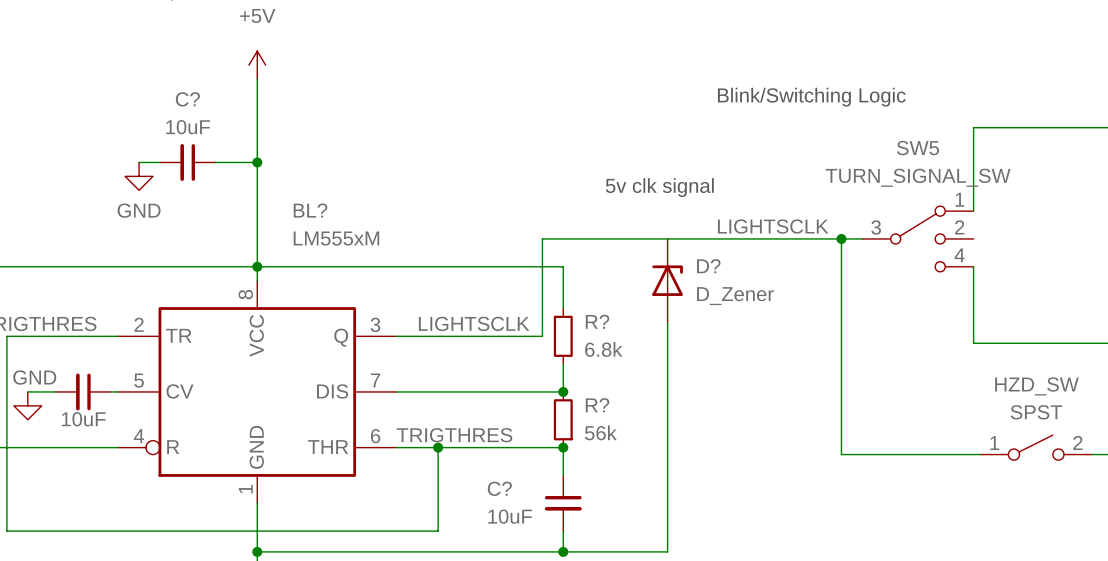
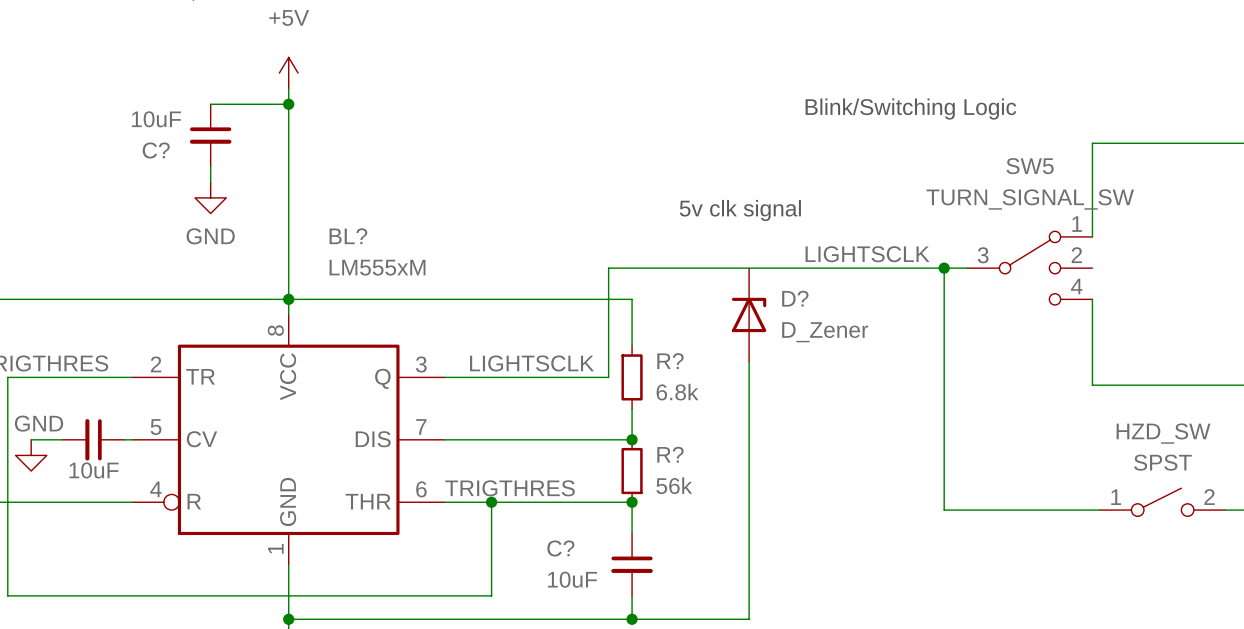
wire: none -> (210, 104) (288, 104)
junction: none -> (288, 104)
wire: none -> (210, 166) (210, 182)
wire: (139, 162) (159, 162) -> none
C? rotation: 0° (187, 162) -> 90° counterclockwise (210, 135)
C? position: (187, 162) -> (210, 135)
wire: (215, 162) (257, 162) -> none
junction: (257, 162) -> none
power symbol position: GND (139, 176) -> GND (210, 197)

